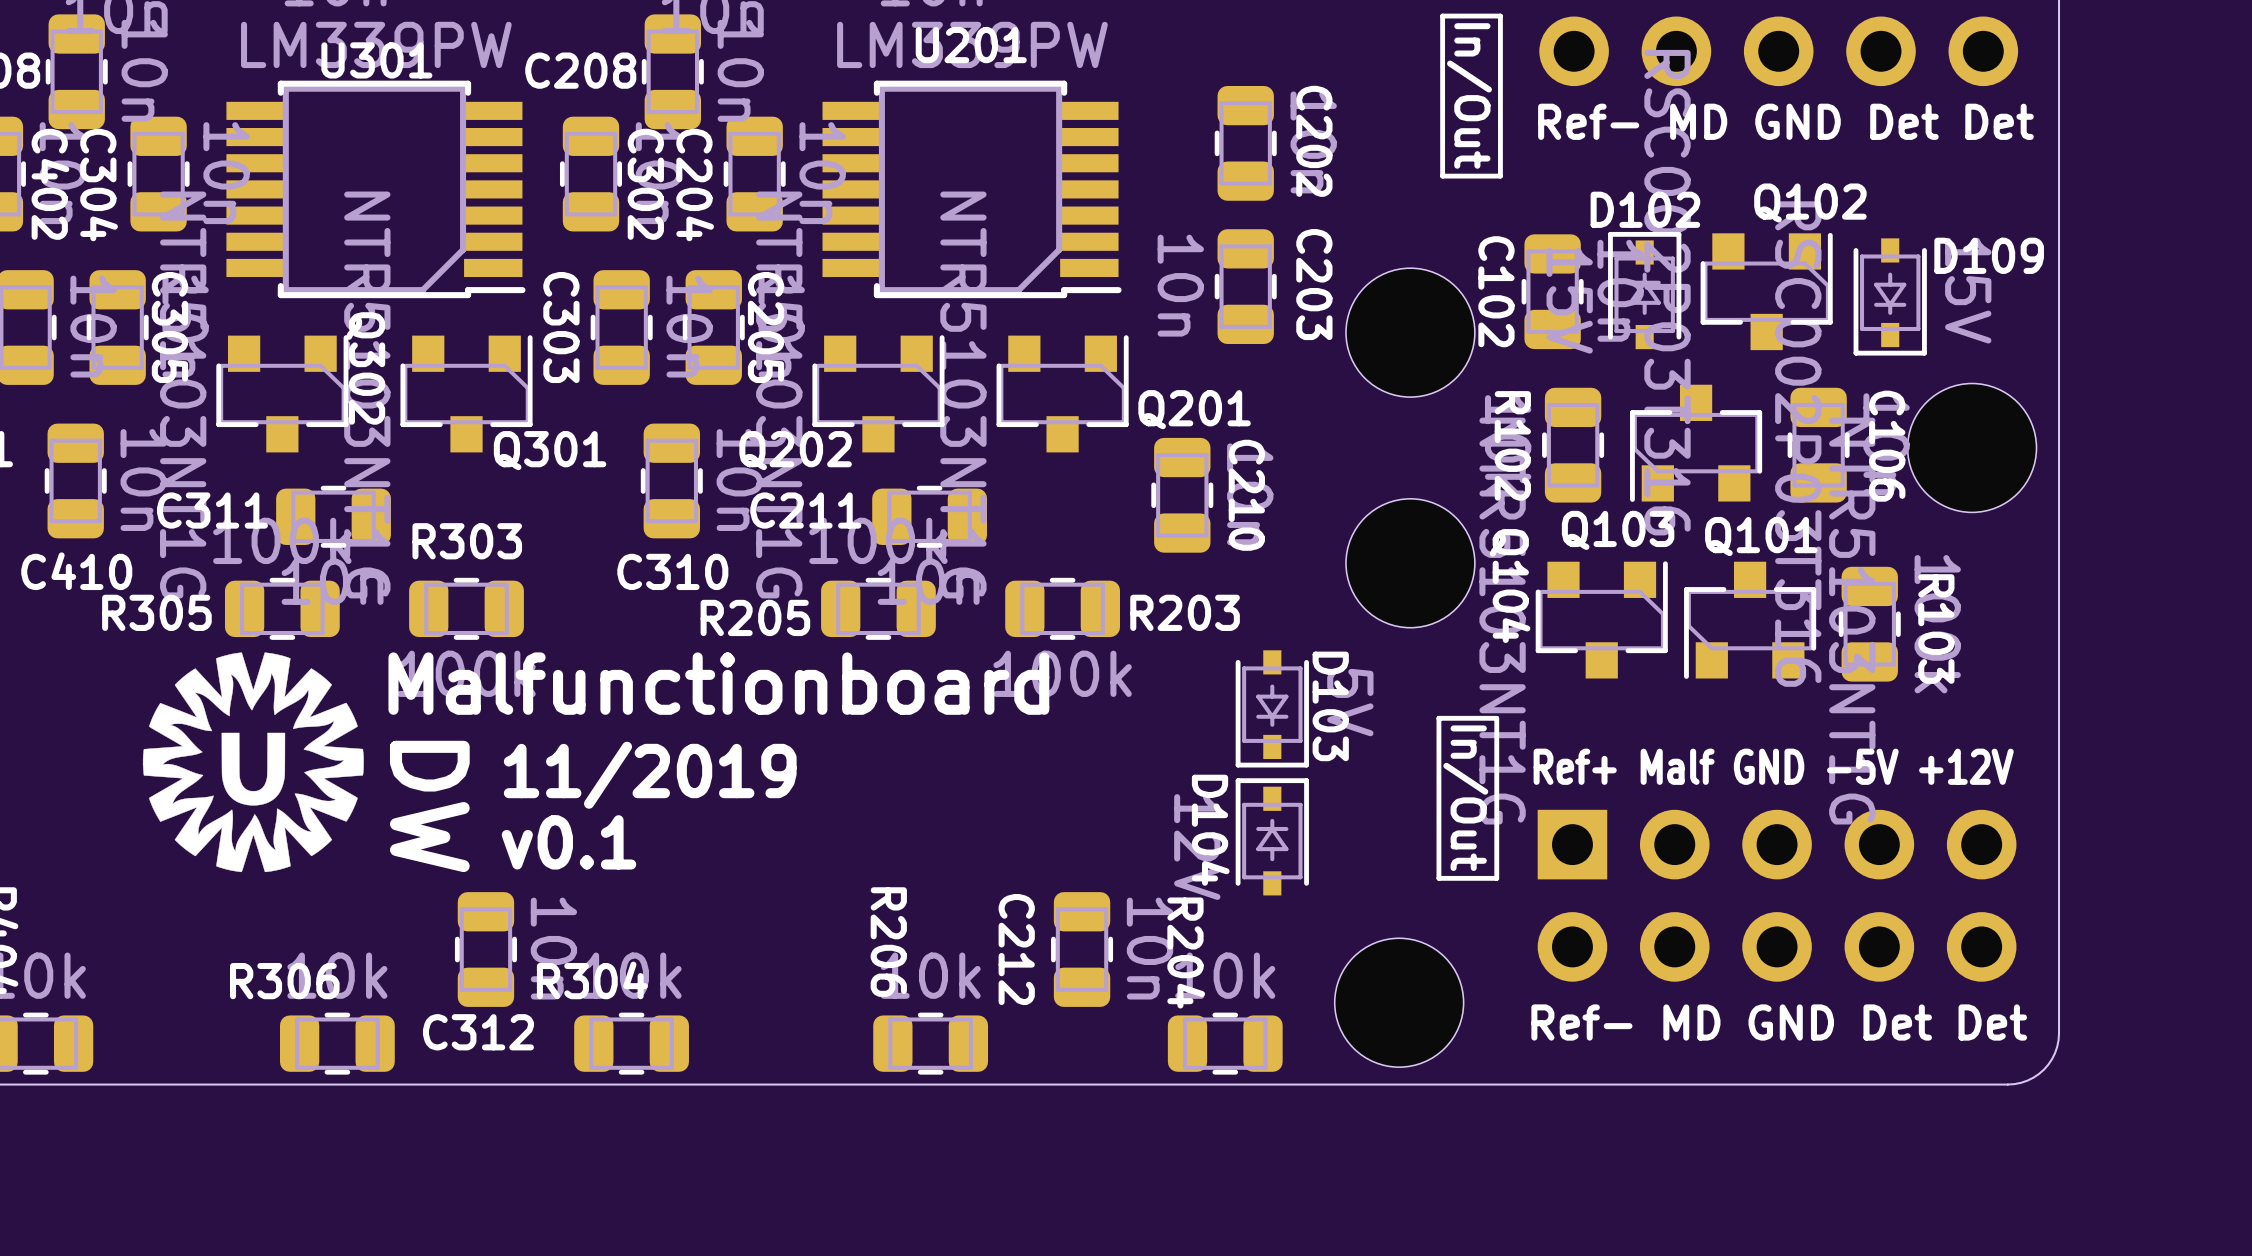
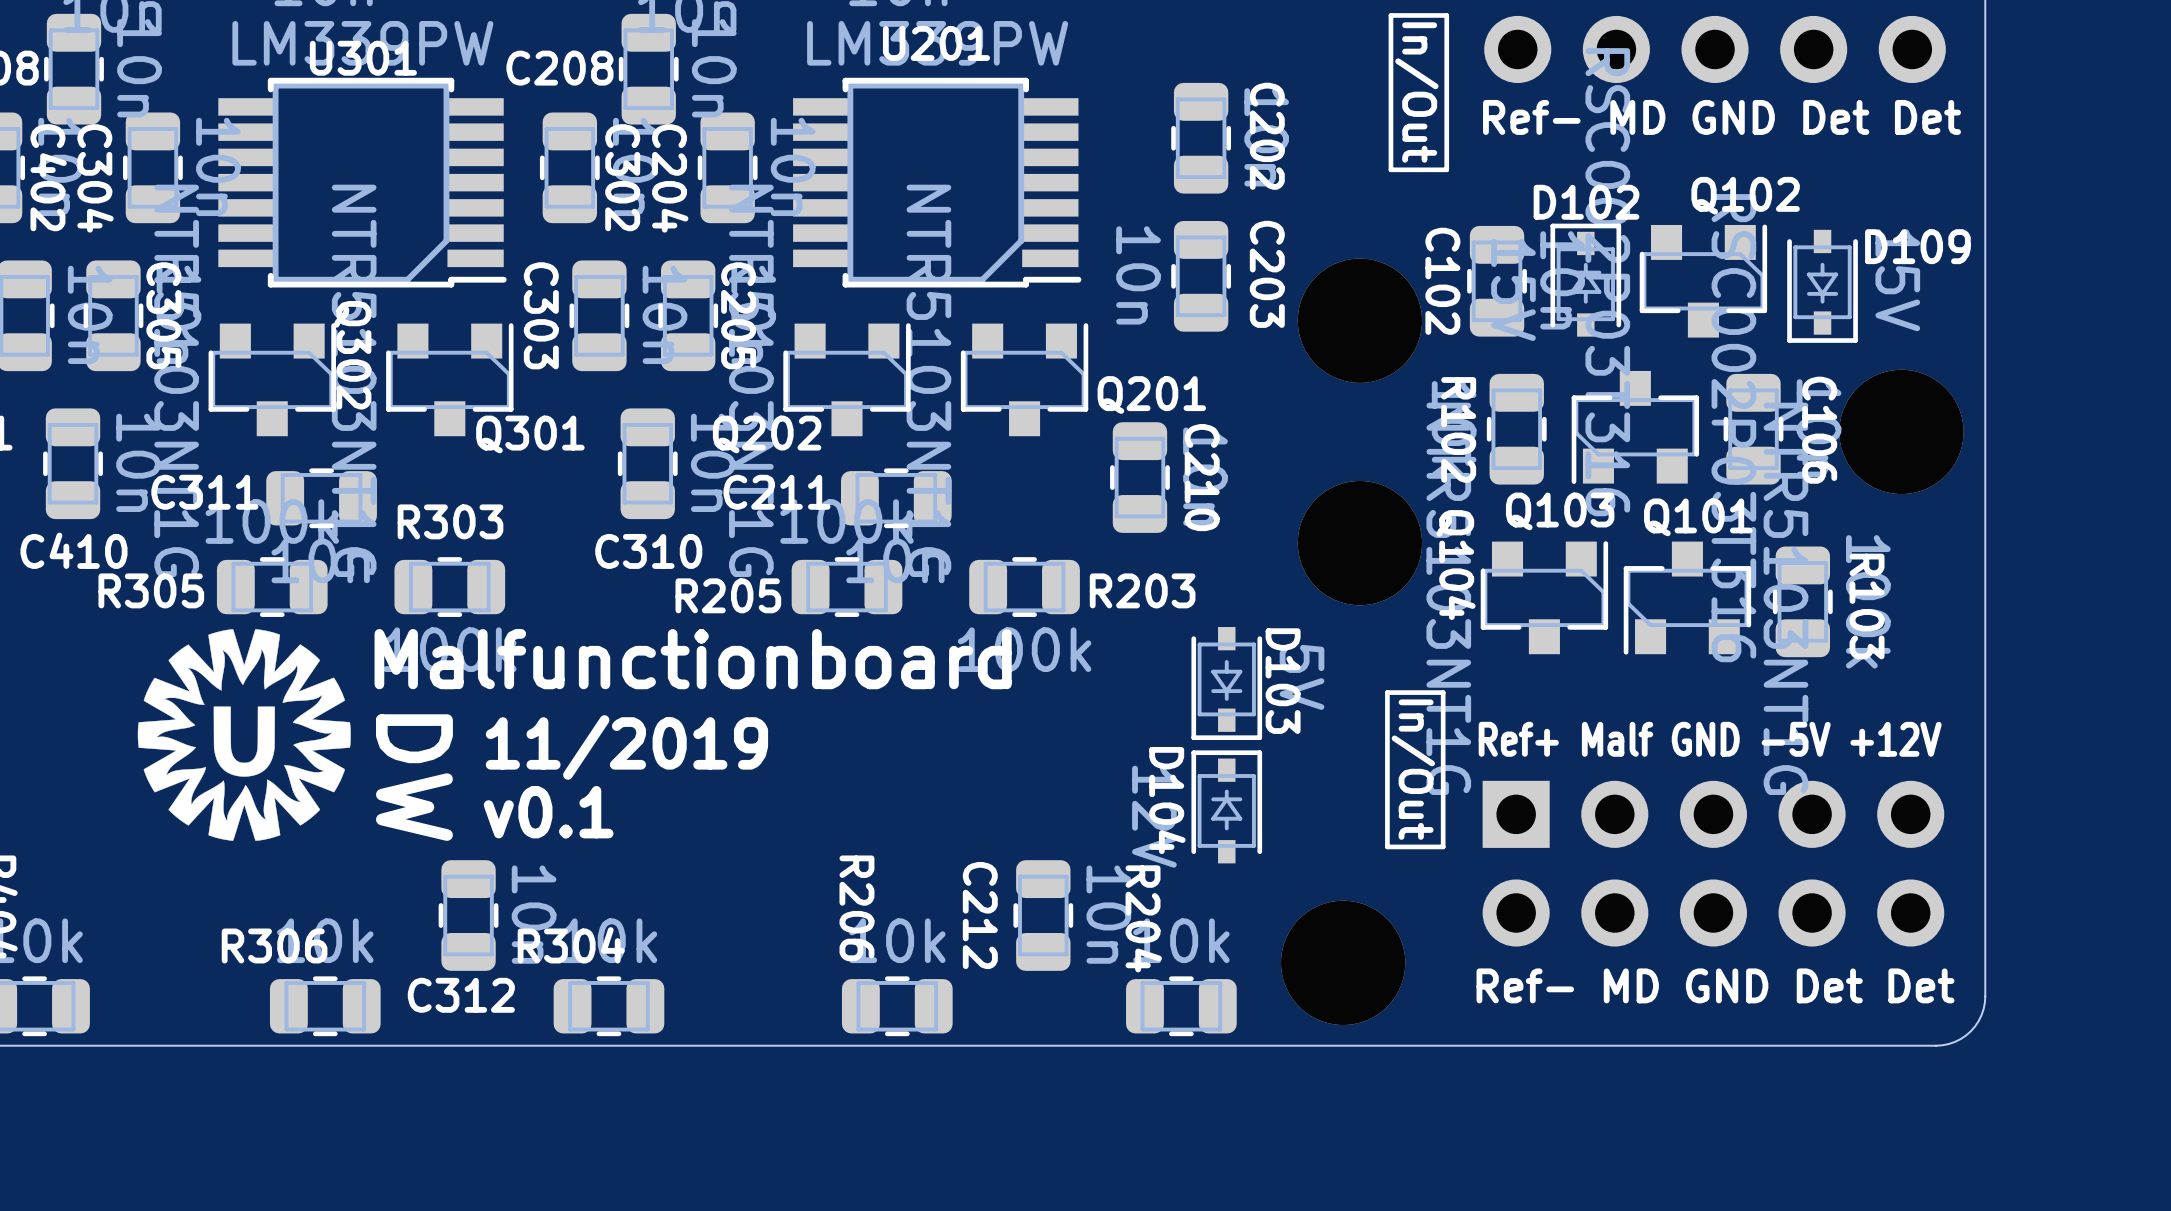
part footprint: [1345, 268, 1475, 398] -> [1297, 258, 1423, 383]
part footprint: [1907, 383, 2037, 513] -> [1839, 369, 1964, 495]
part footprint: [1345, 498, 1475, 628] -> [1297, 480, 1423, 606]
part footprint: [1334, 938, 1464, 1068] -> [1281, 900, 1406, 1026]

